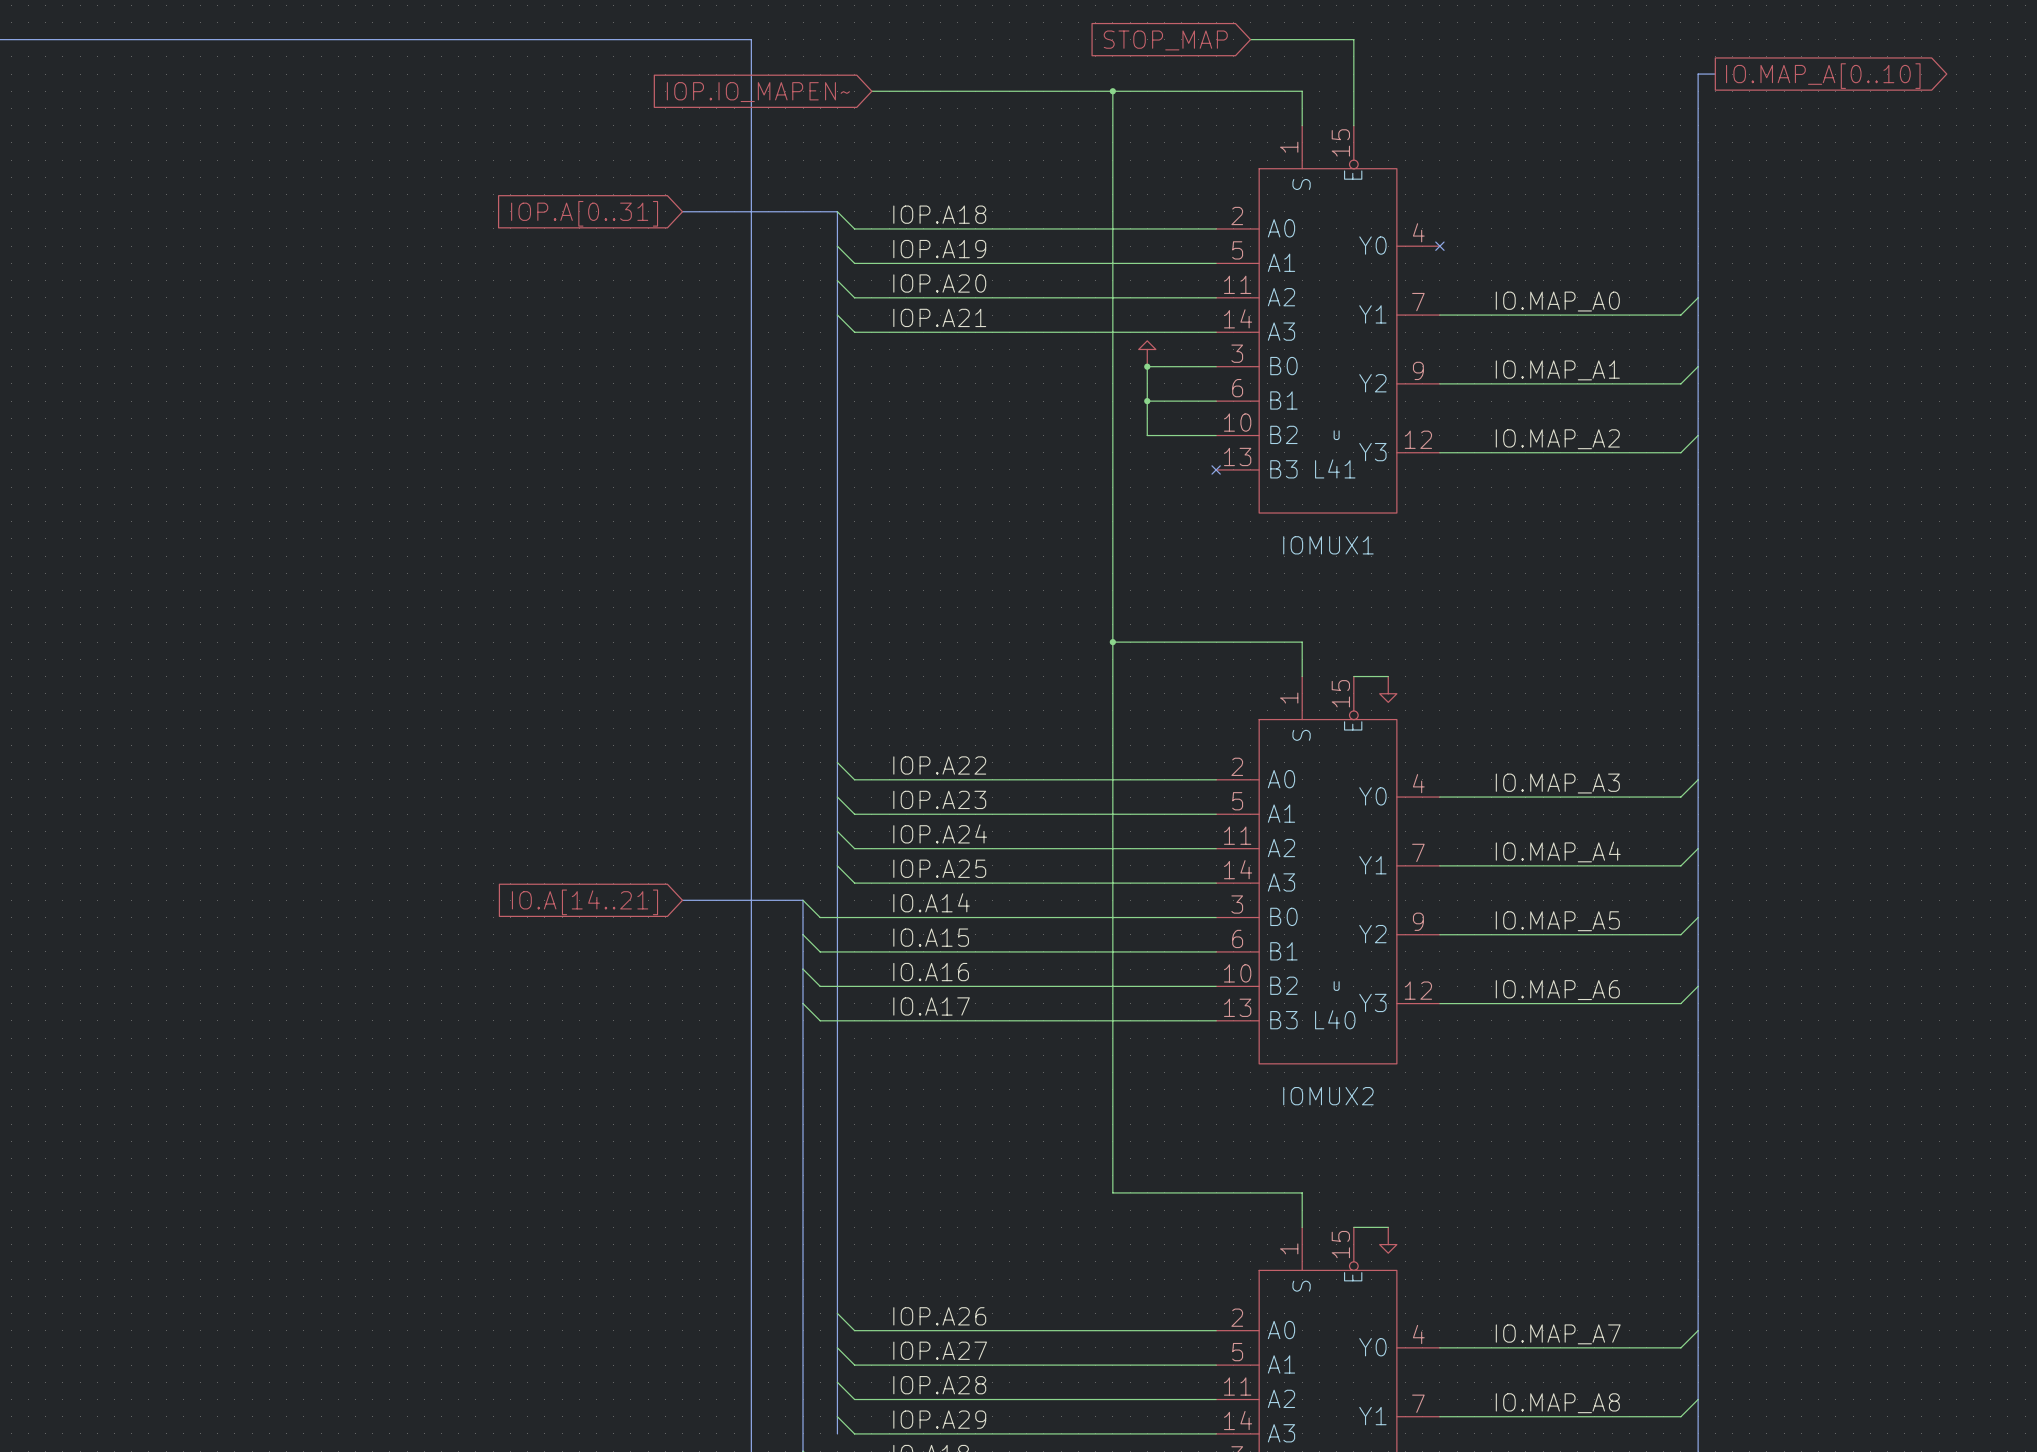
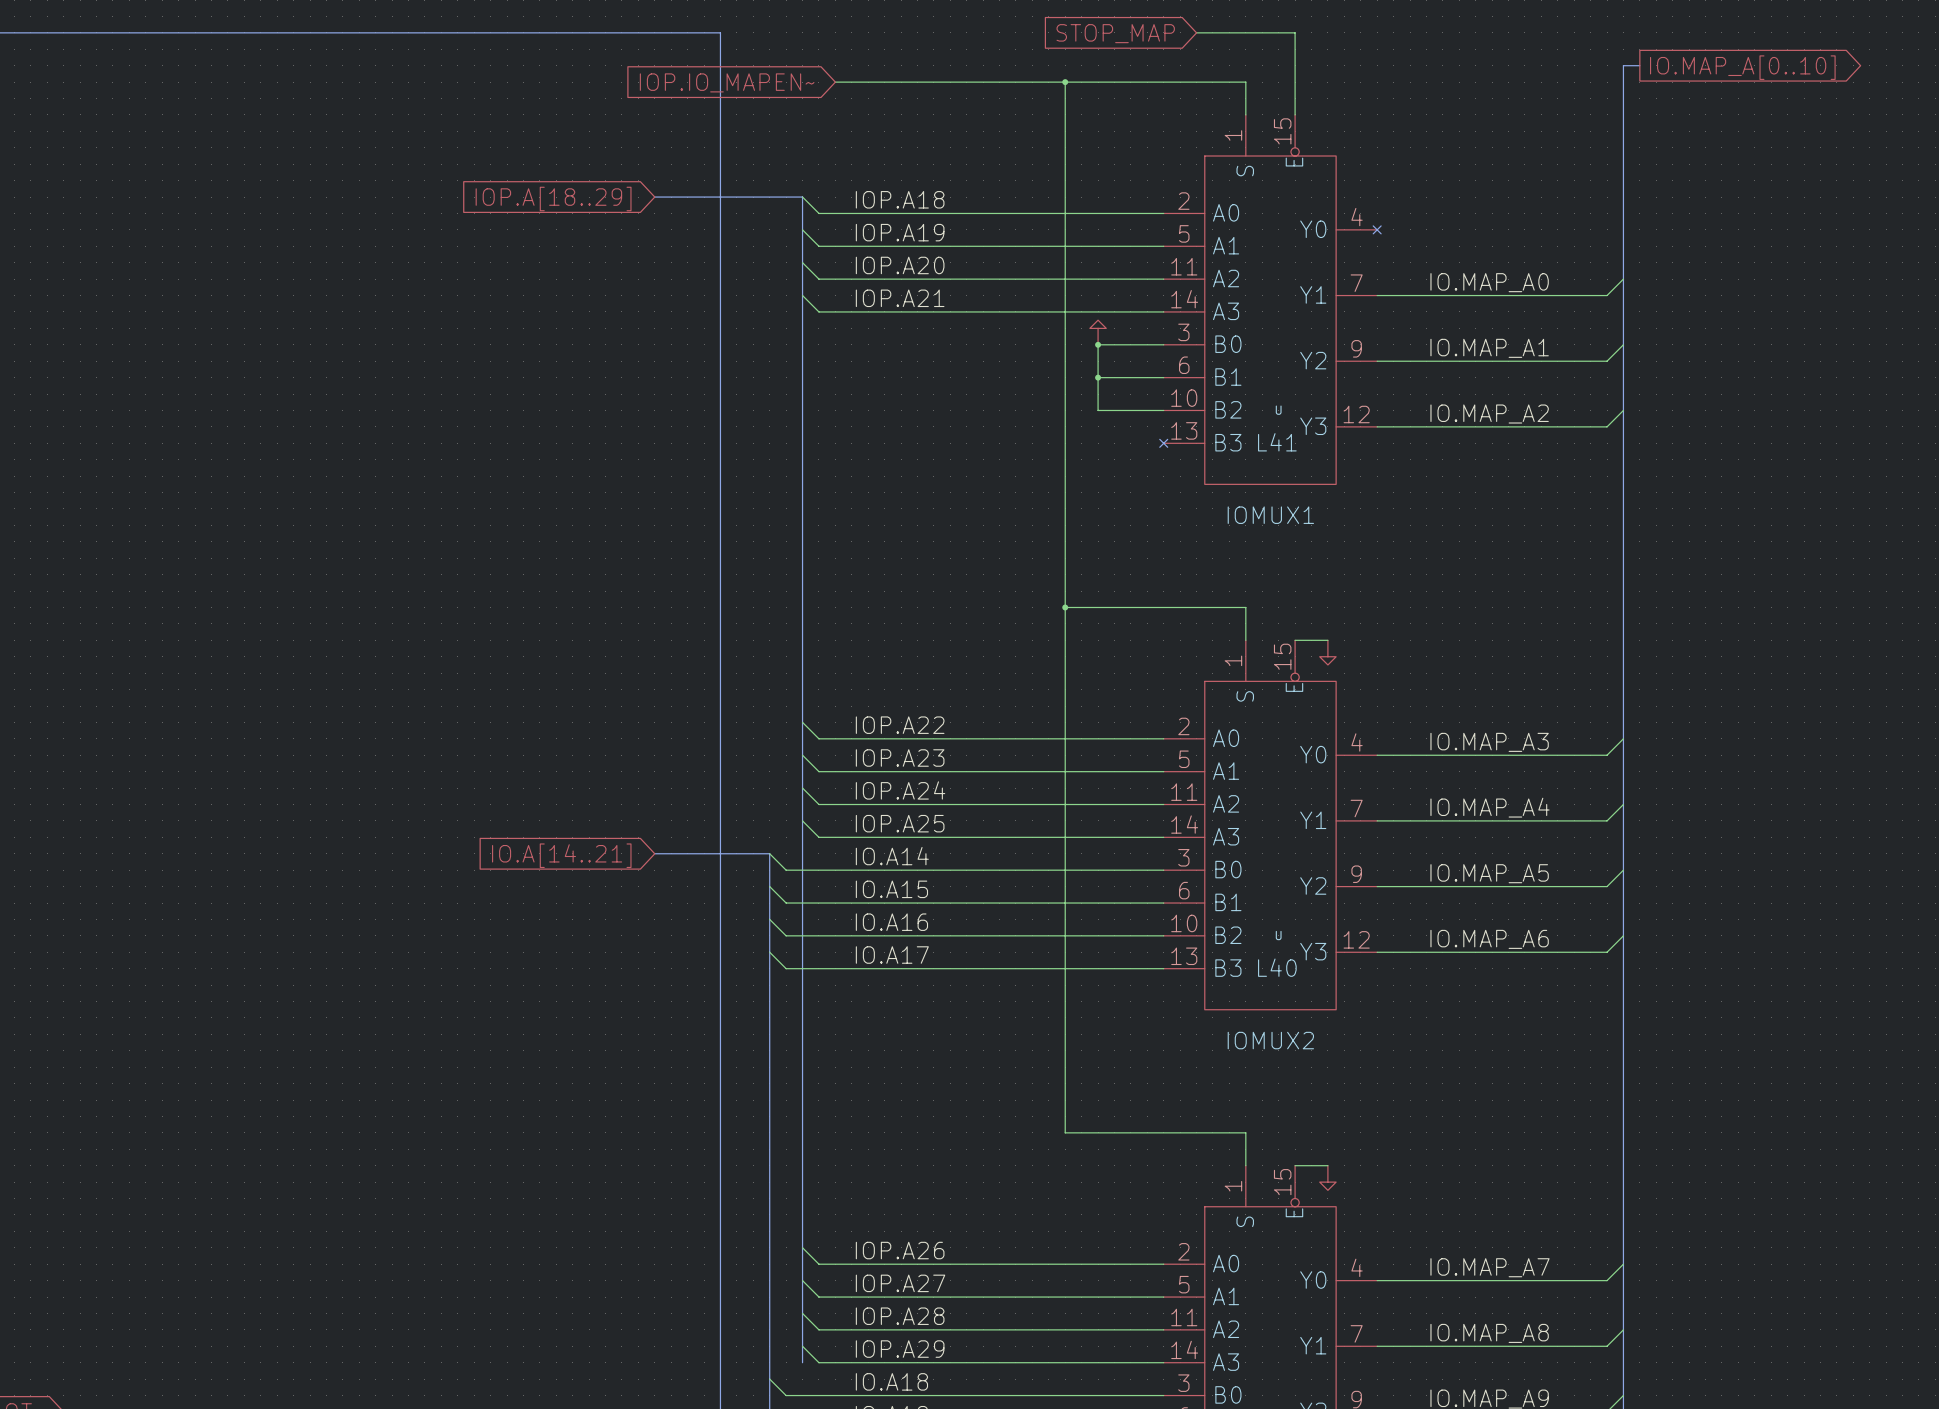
global label: IOP.A[0..31] (584, 213) -> IOP.A[18..29] (553, 199)

